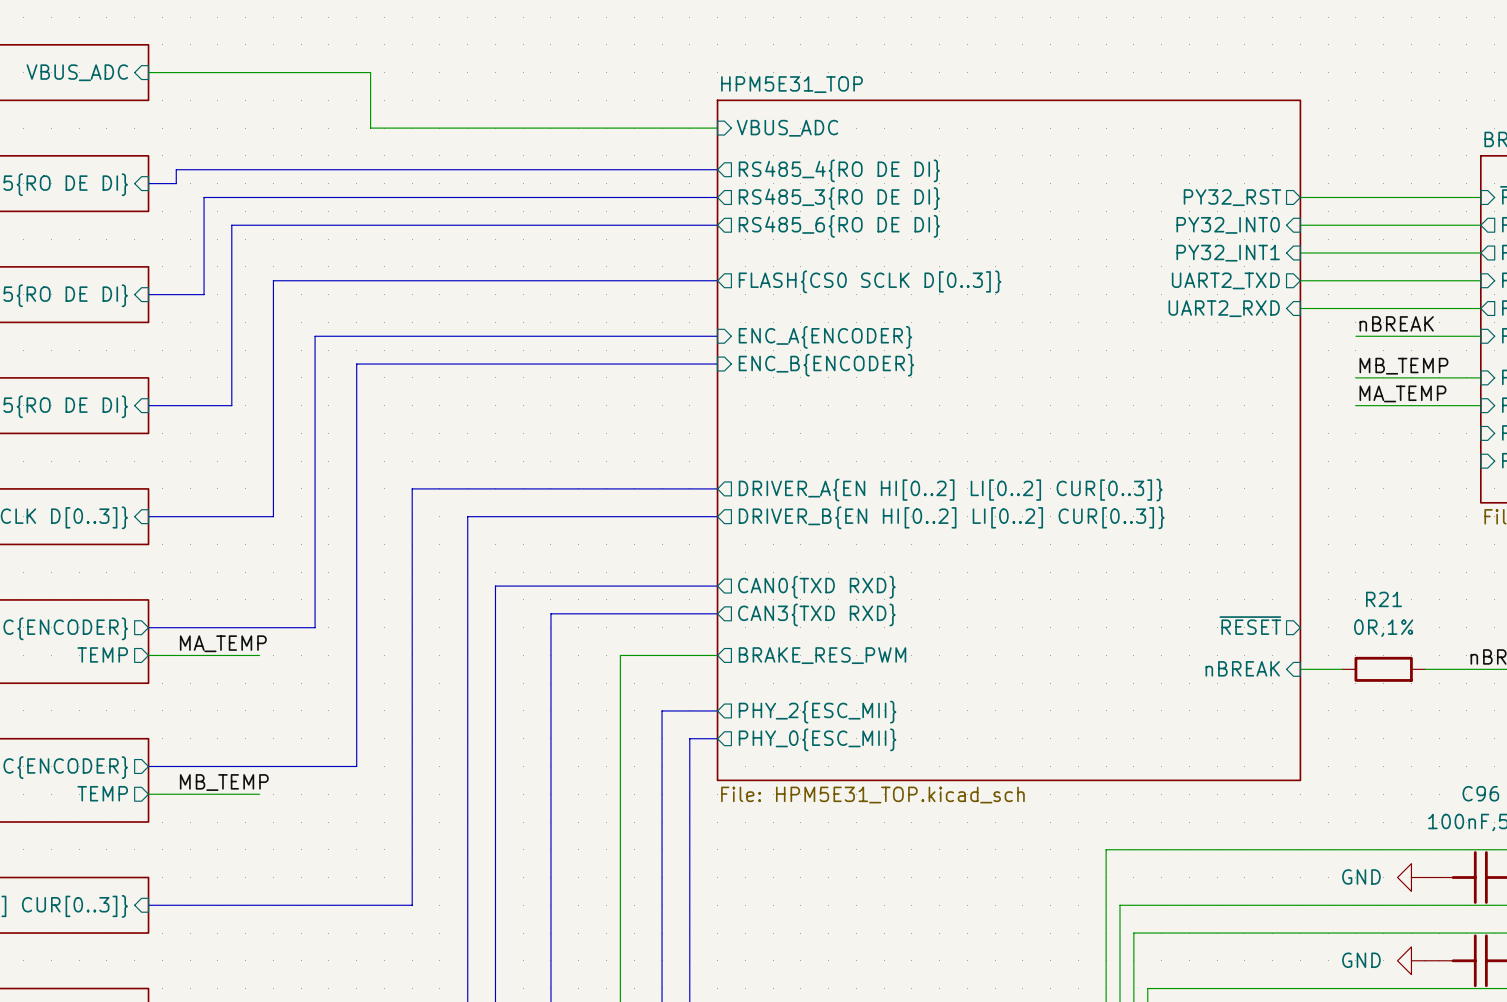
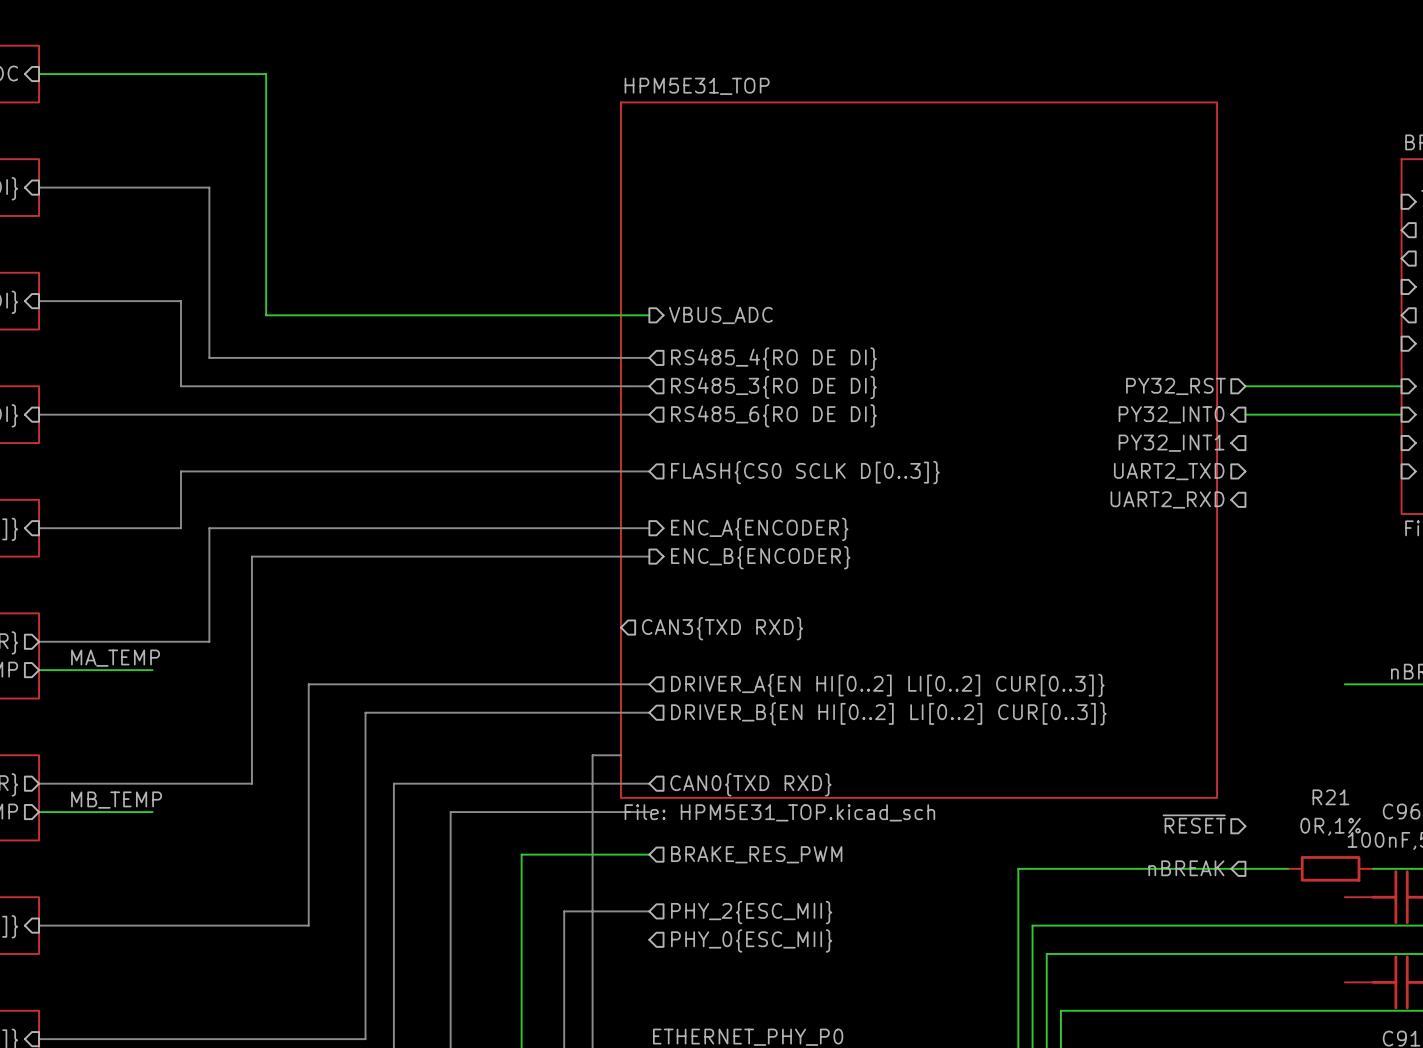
wire: (370, 128) (717, 128) -> (266, 130) (266, 315) (649, 315)
sheet pin position: VBUS_ADC (787, 128) -> VBUS_ADC (720, 315)
bus: (717, 169) (176, 169) (176, 183) -> (209, 343) (209, 187) (67, 187)
sheet pin position: RS485_4{RO DE DI} (839, 170) -> RS485_4{RO DE DI} (773, 359)
bus: (717, 197) (204, 197) (204, 294) -> (649, 386) (181, 386) (181, 301) (95, 301)
sheet pin position: PY32_RST (1232, 197) -> PY32_RST (1175, 386)
wire: (1300, 197) (1480, 197) -> none
sheet pin position: RS485_3{RO DE DI} (839, 198) -> RS485_3{RO DE DI} (773, 387)
bus: (717, 225) (231, 225) (231, 405) -> (649, 414) (124, 414)
sheet pin position: PY32_INT0 (1228, 225) -> PY32_INT0 (1171, 414)
wire: (1300, 225) (1480, 225) -> none
sheet pin position: RS485_6{RO DE DI} (839, 226) -> RS485_6{RO DE DI} (773, 415)
sheet pin position: PY32_INT1 (1228, 253) -> PY32_INT1 (1171, 443)
wire: (1300, 253) (1480, 253) -> none
bus: (717, 280) (273, 280) (273, 516) -> (649, 471) (181, 471) (181, 528) (166, 528)
sheet pin position: UART2_TXD (1225, 280) -> UART2_TXD (1169, 471)
wire: (1300, 280) (1480, 280) -> none
sheet pin position: FLASH{CS0 SCLK D[0..3]} (870, 281) -> FLASH{CS0 SCLK D[0..3]} (805, 472)
sheet pin position: UART2_RXD (1224, 308) -> UART2_RXD (1167, 499)
wire: (1300, 308) (1480, 308) -> none
label: nBREAK (1396, 323) -> none
bus: (315, 336) (717, 336) -> none
wire: (1355, 336) (1480, 336) -> none
sheet pin position: ENC_A{ENCODER} (825, 337) -> ENC_A{ENCODER} (759, 529)
bus: (315, 350) (315, 516) -> (365, 528) (209, 528)
bus: none -> (209, 357) (649, 357)
bus: (717, 364) (356, 364) (356, 544) -> (649, 556) (251, 556)
sheet pin position: ENC_B{ENCODER} (826, 365) -> ENC_B{ENCODER} (760, 557)
label: MB_TEMP (1403, 366) -> none
wire: none -> (1245, 386) (1273, 386)
label: MA_TEMP (1402, 393) -> none
wire: none -> (1245, 414) (1273, 414)
bus: (717, 488) (412, 488) (412, 669) -> (649, 684) (308, 684)
sheet pin position: DRIVER_A{EN HI[0..2] LI[0..2] CUR[0..3]} (950, 490) -> DRIVER_A{EN HI[0..2] LI[0..2] CUR[0..3]} (887, 685)
bus: (467, 516) (467, 697) -> (649, 712) (365, 712)
bus: none -> (620, 528) (649, 528)
sheet pin position: DRIVER_B{EN HI[0..2] LI[0..2] CUR[0..3]} (951, 517) -> DRIVER_B{EN HI[0..2] LI[0..2] CUR[0..3]} (888, 713)
bus: (717, 586) (495, 586) (495, 766) -> (649, 783) (393, 783)
sheet pin position: CAN0{TXD RXD} (816, 587) -> CAN0{TXD RXD} (750, 784)
bus: (717, 613) (550, 613) (550, 794) -> (649, 812) (450, 812)
sheet pin position: ~{RESET} (1250, 625) -> ~{RESET} (1194, 824)
wire: (717, 655) (620, 655) (620, 835) -> (649, 854) (521, 854)
sheet pin position: BRAKE_RES_PWM (822, 655) -> BRAKE_RES_PWM (756, 854)
sheet pin position: nBREAK (1242, 668) -> nBREAK (1186, 868)
wire: (1300, 669) (1342, 669) -> none
R21 position: (1383, 669) -> (1330, 868)
bus: (717, 710) (662, 710) (662, 891) -> (649, 911) (564, 911)
sheet pin position: PHY_2{ESC_MII} (817, 712) -> PHY_2{ESC_MII} (751, 912)
sheet pin position: PHY_0{ESC_MII} (817, 739) -> PHY_0{ESC_MII} (751, 940)
wire: (1369, 849) (1453, 849) -> none
power symbol: GND (1411, 877) -> none
power symbol: GND (1411, 960) -> none

